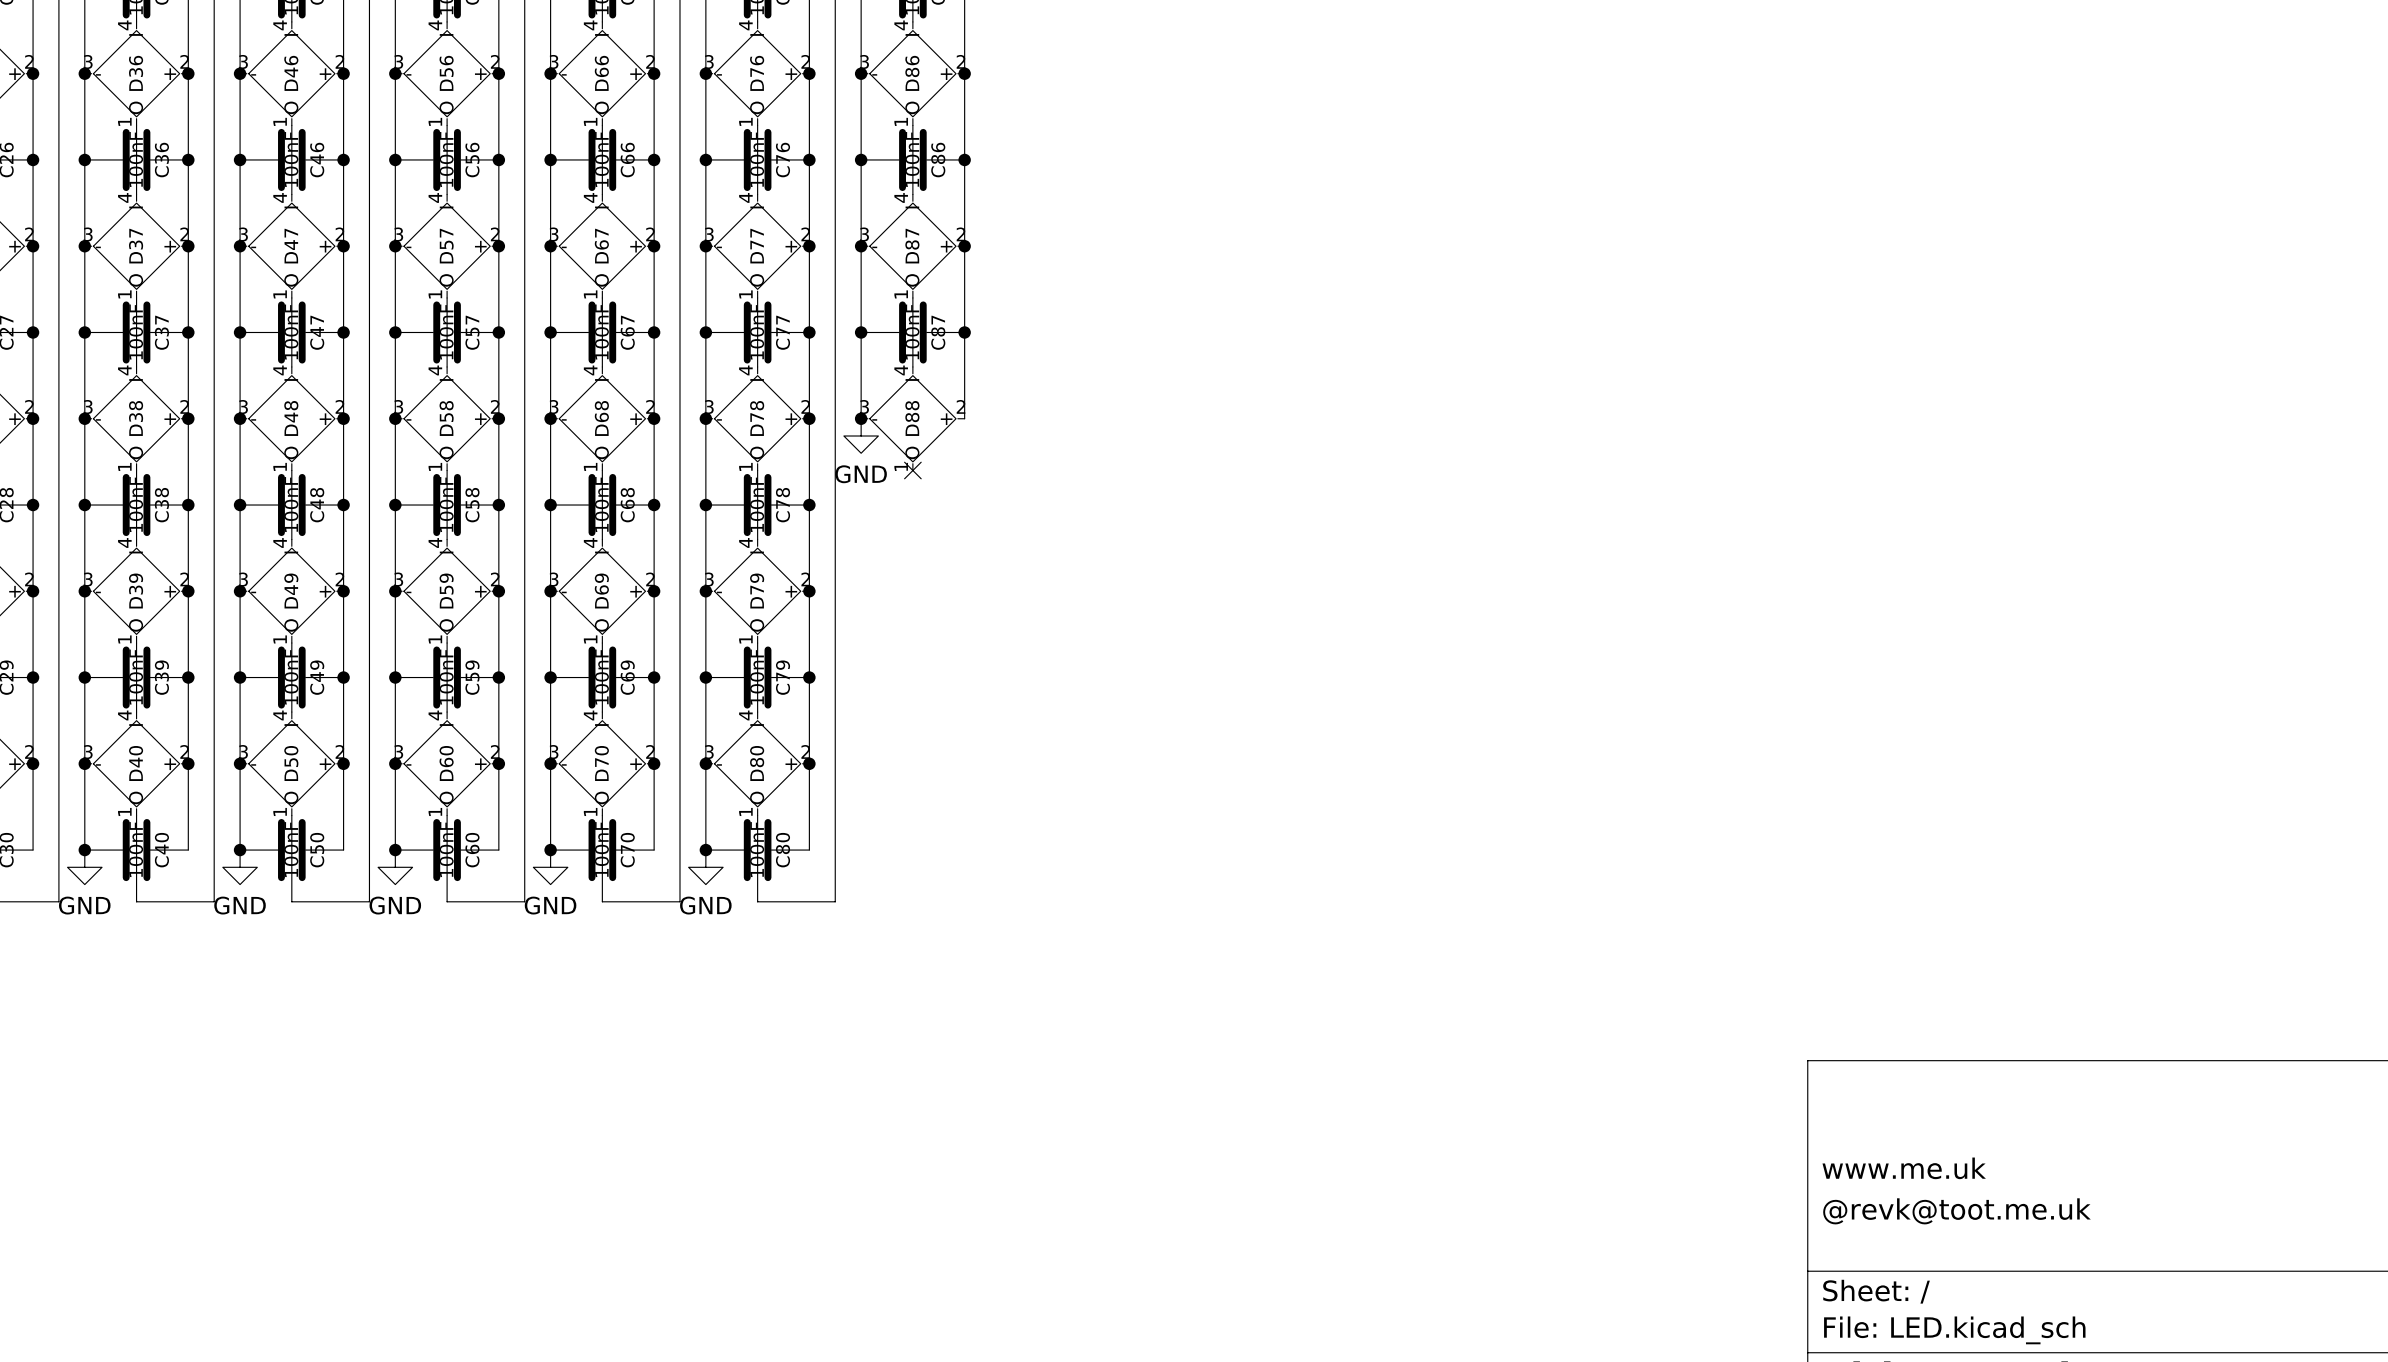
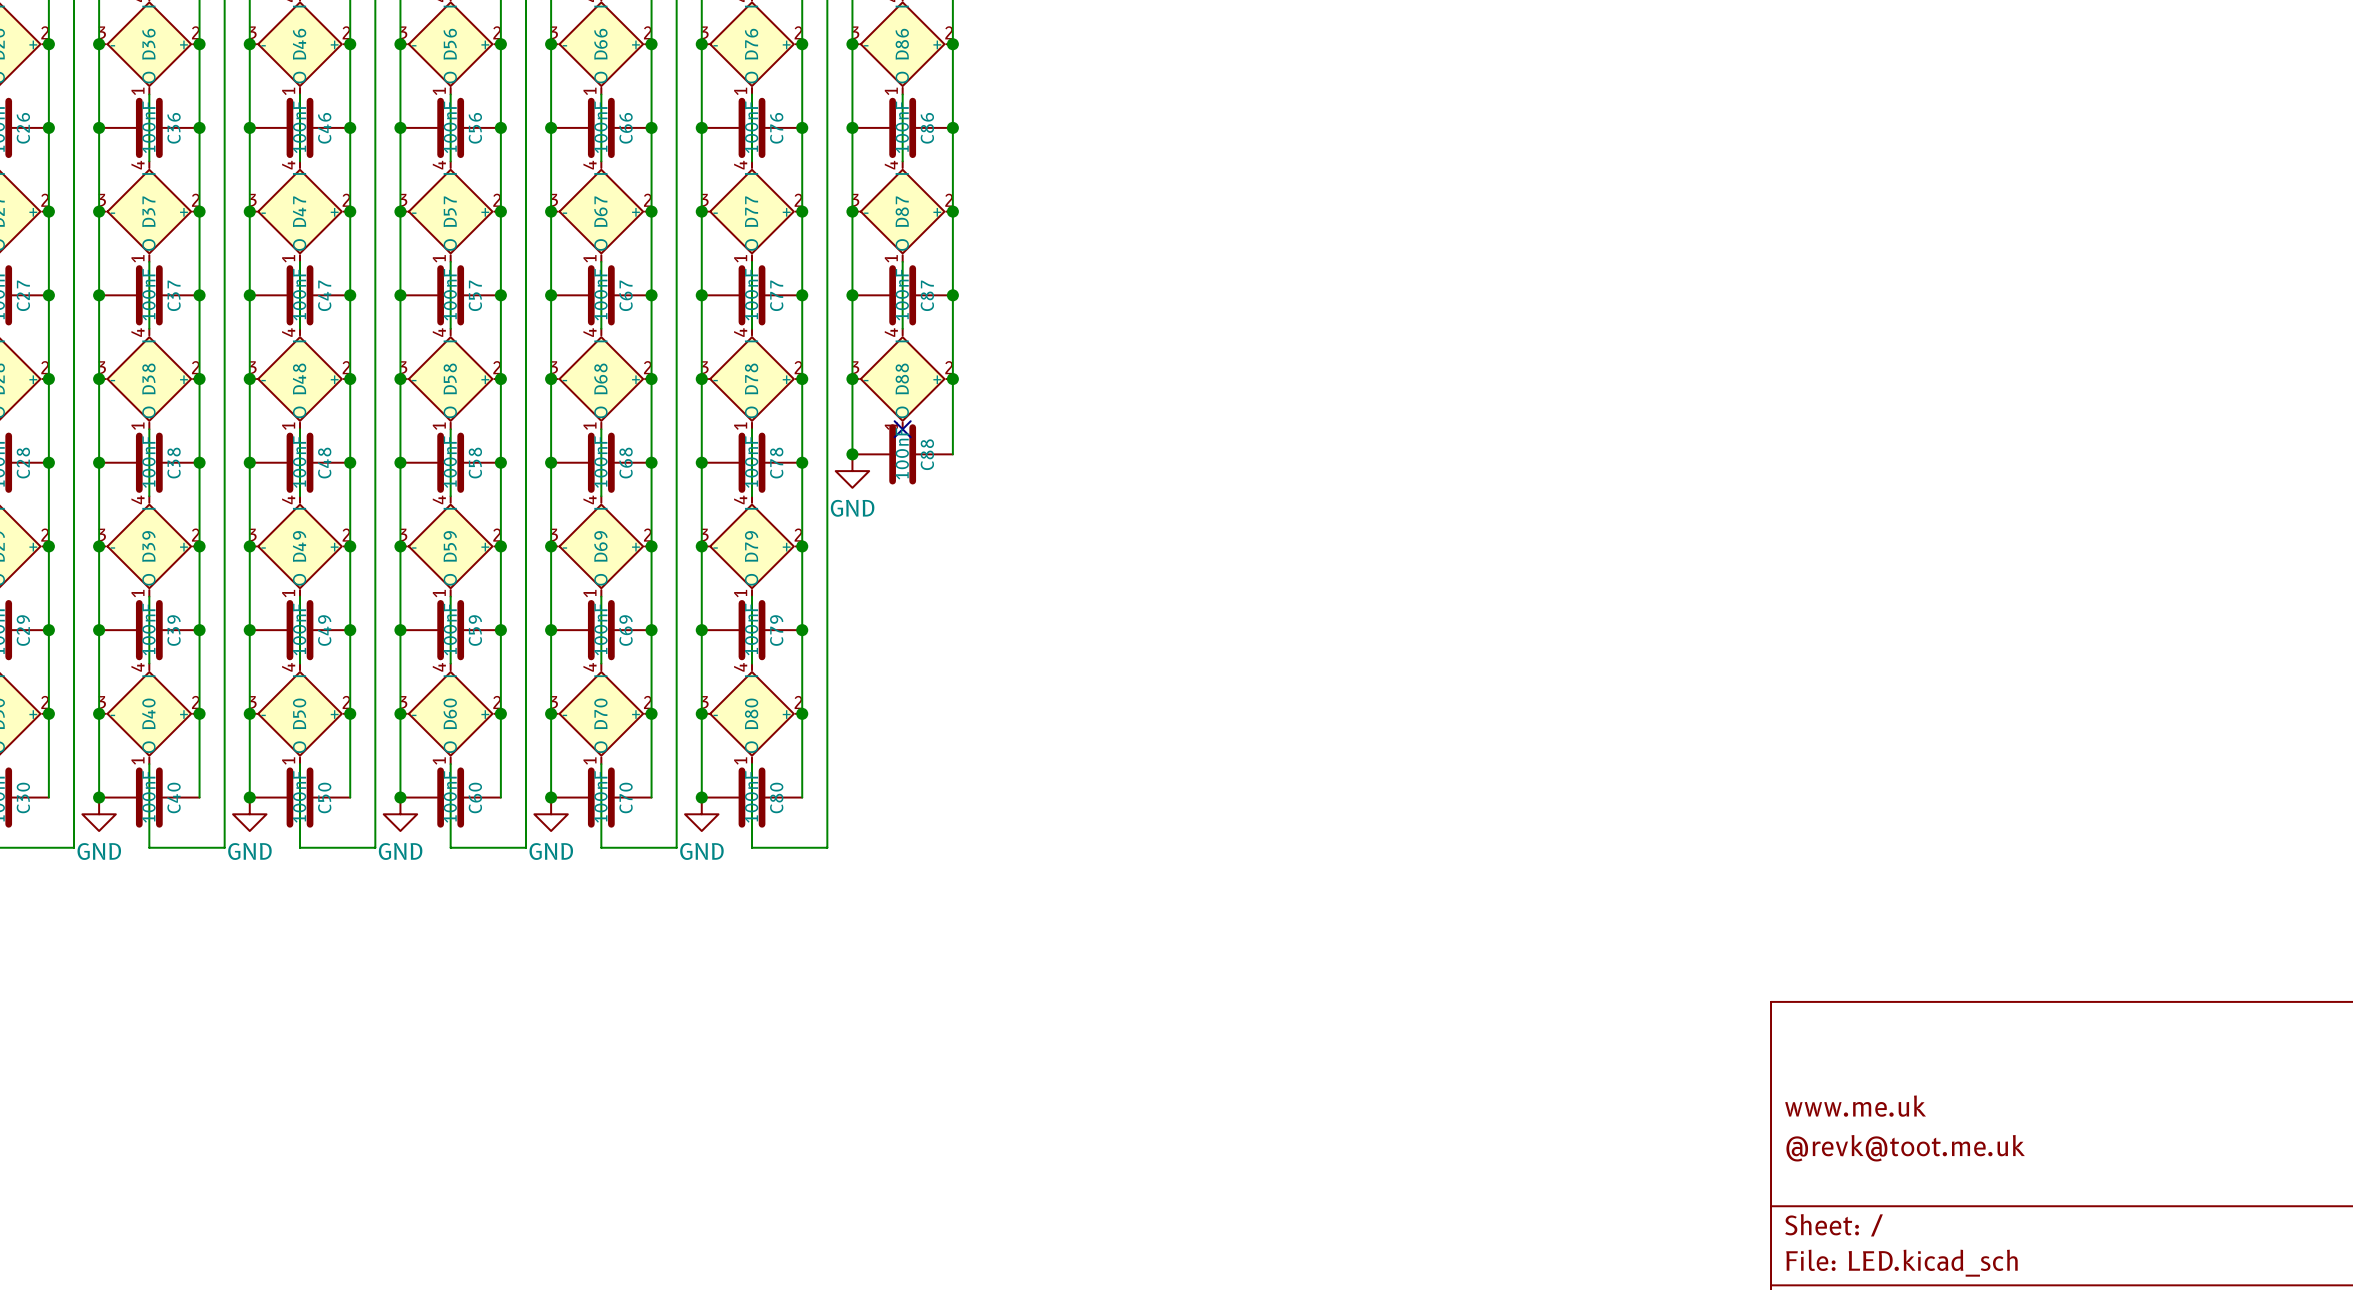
wire: none -> (852, 379) (852, 454)
wire: none -> (952, 379) (952, 454)
junction: none -> (952, 379)
power symbol position: GND (861, 436) -> GND (852, 471)
junction: none -> (852, 454)
C88: none -> 100nF (902, 454)

